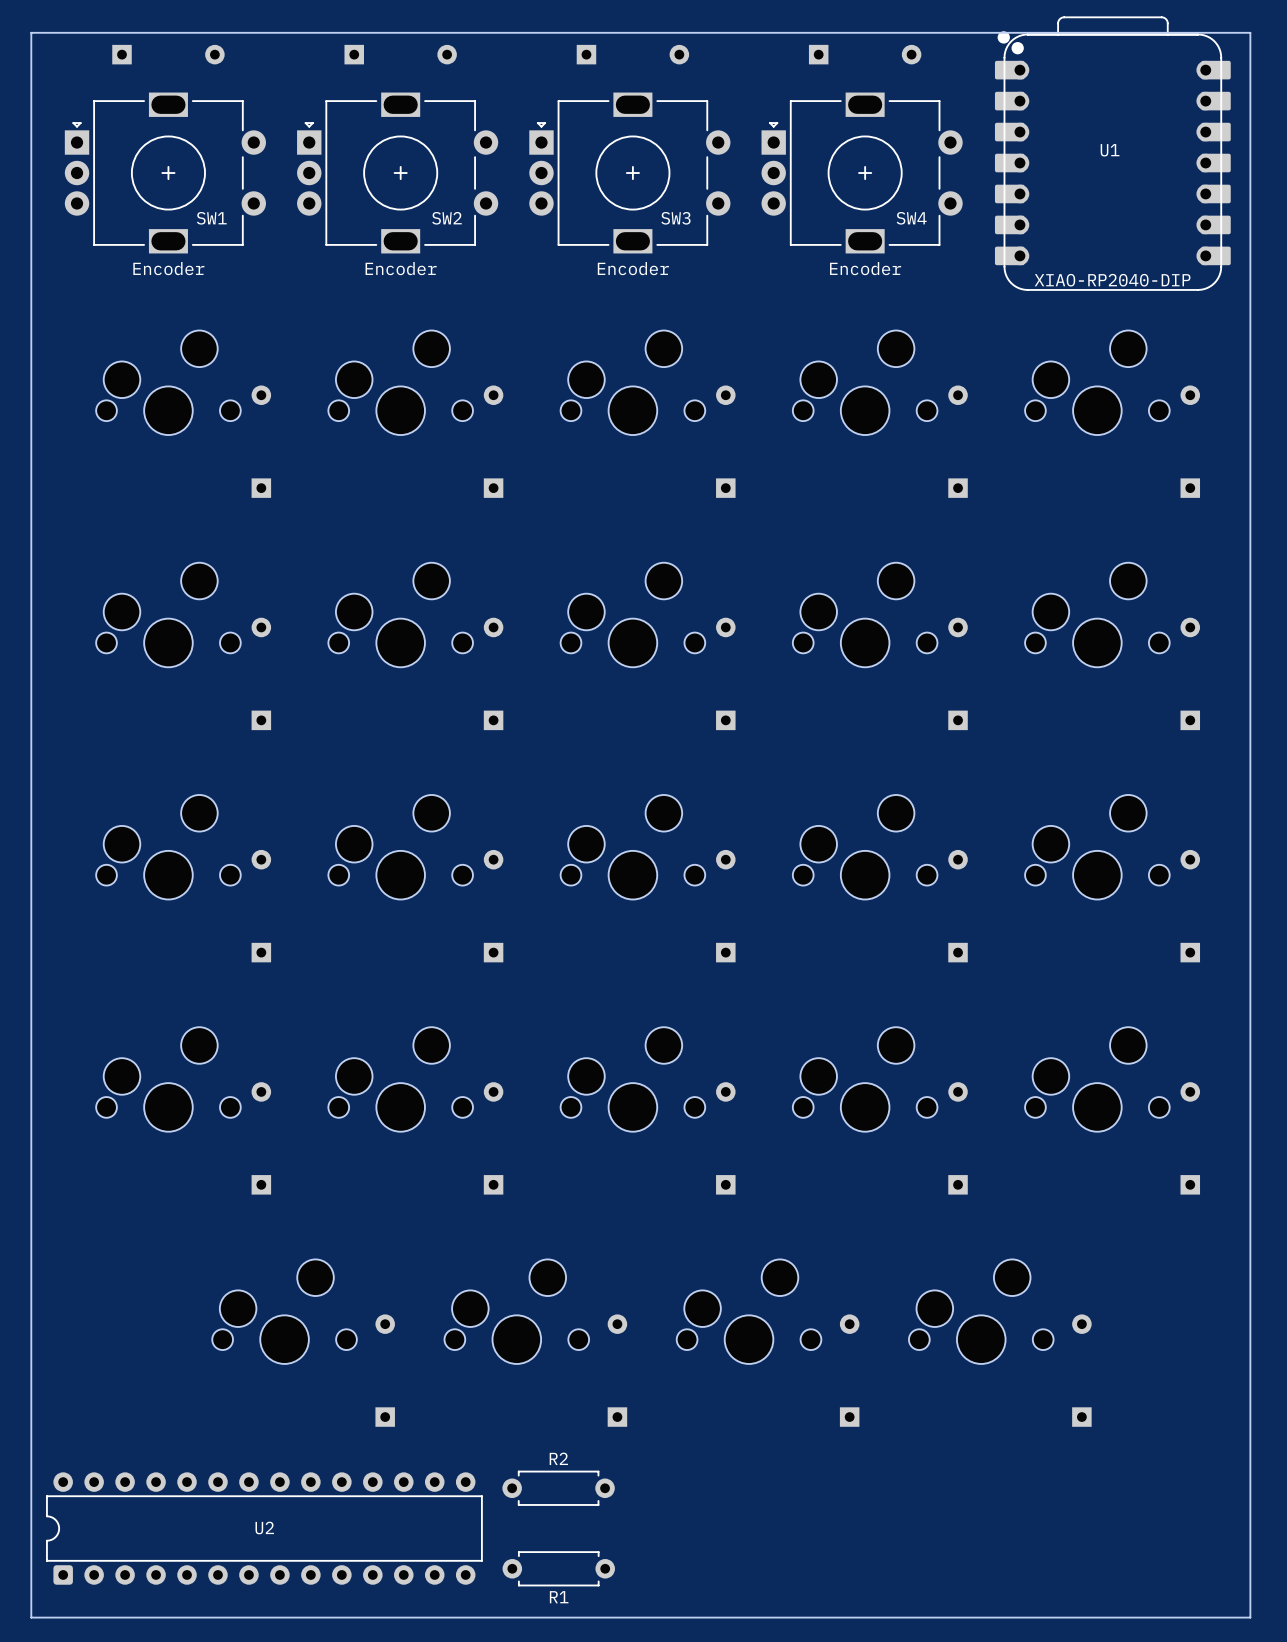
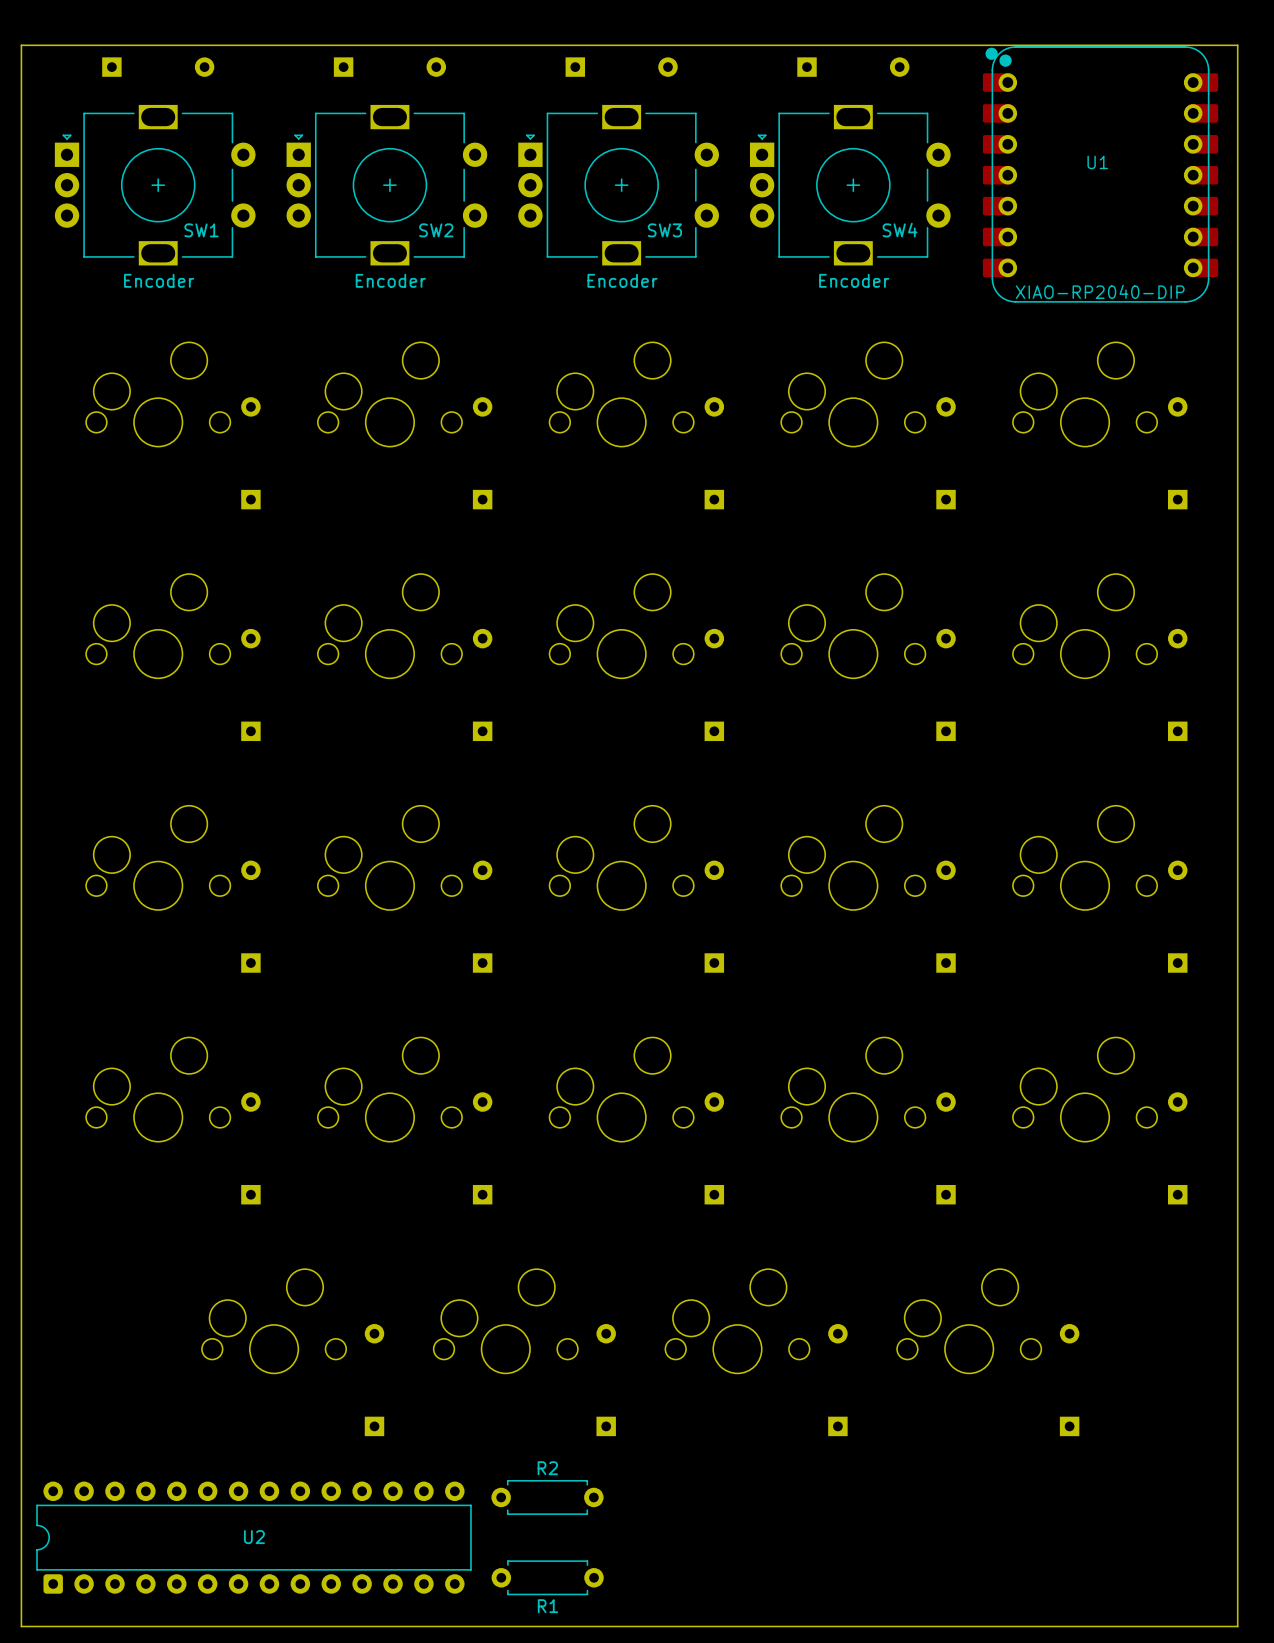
U1 footprint: [994, 16, 1231, 291] -> [982, 46, 1219, 303]

